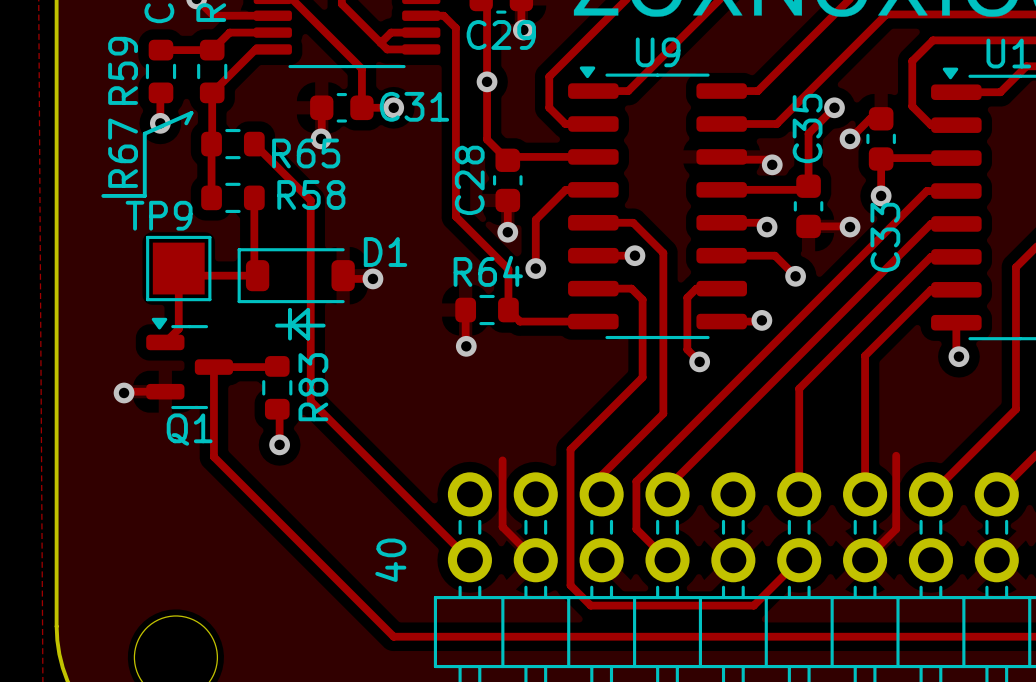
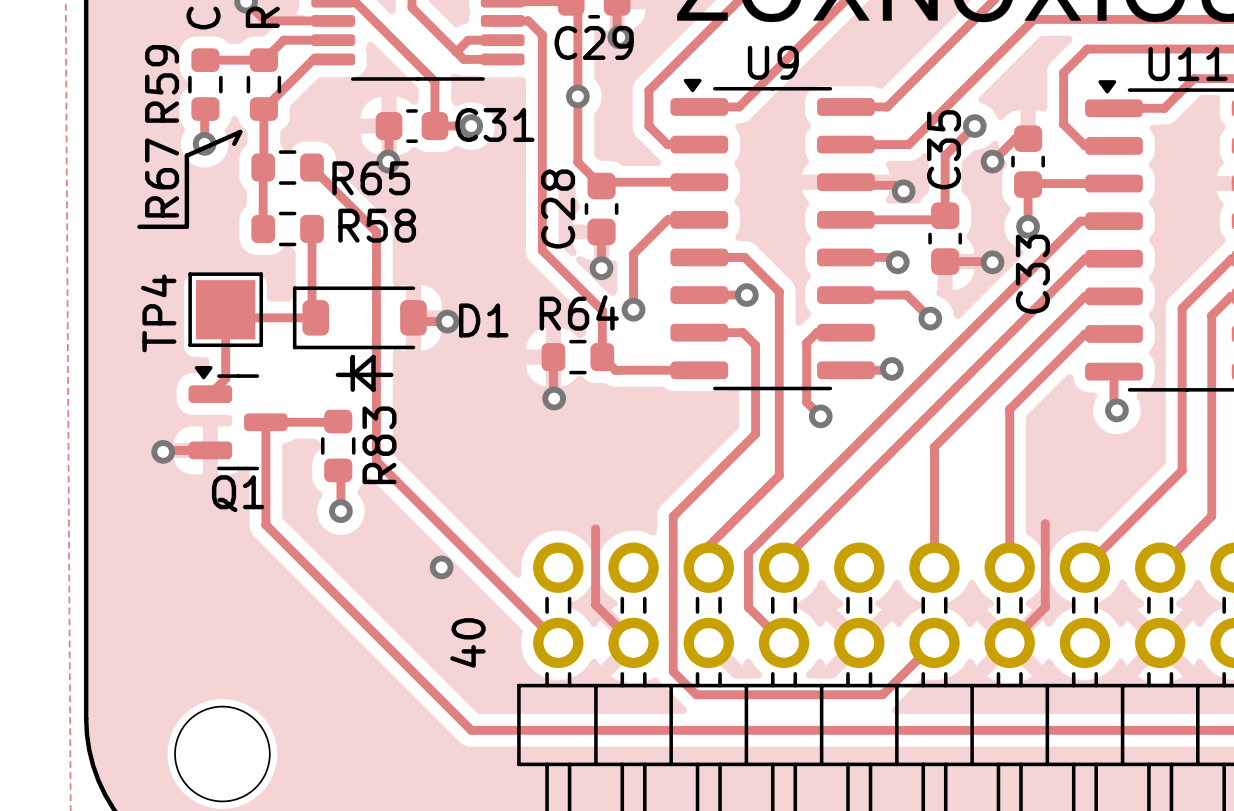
TP9 name: TP9 (159, 215) -> TP4 (158, 313)
D1 name position: D1 (385, 252) -> D1 (483, 320)
via: none -> (441, 567)

